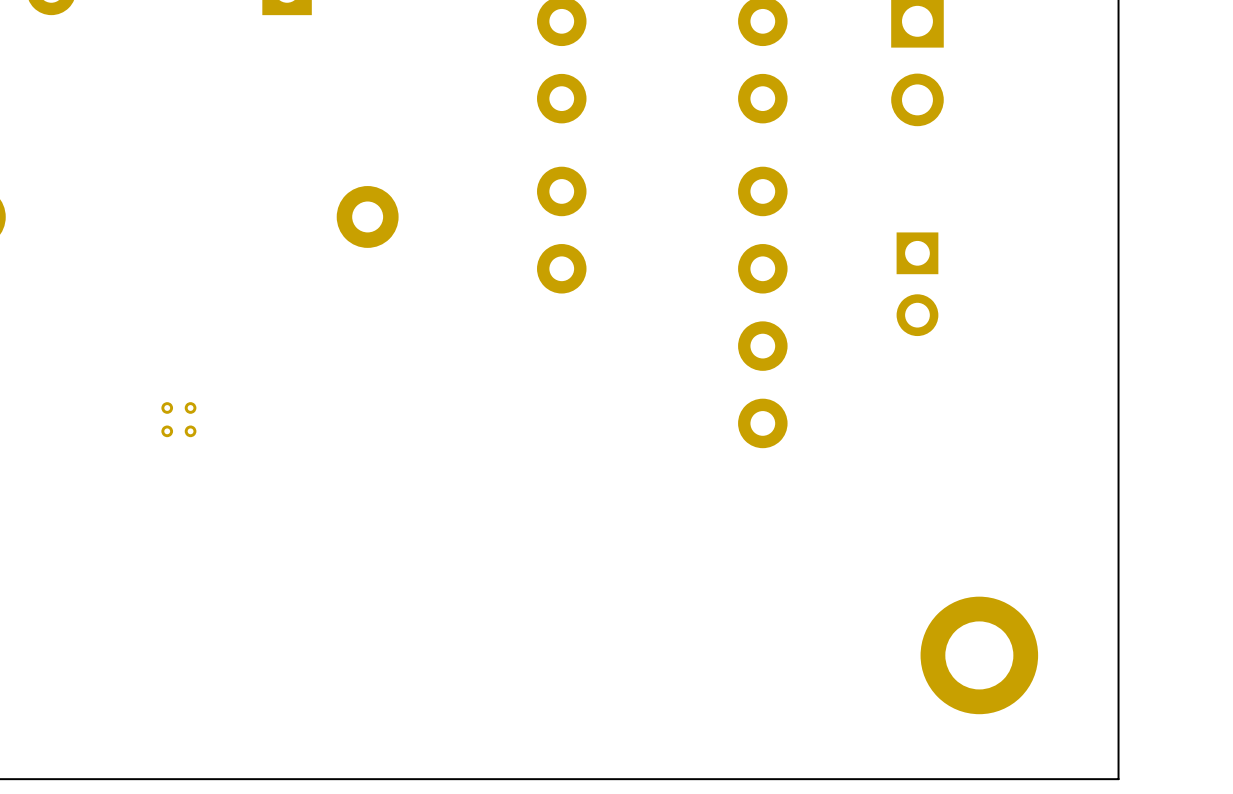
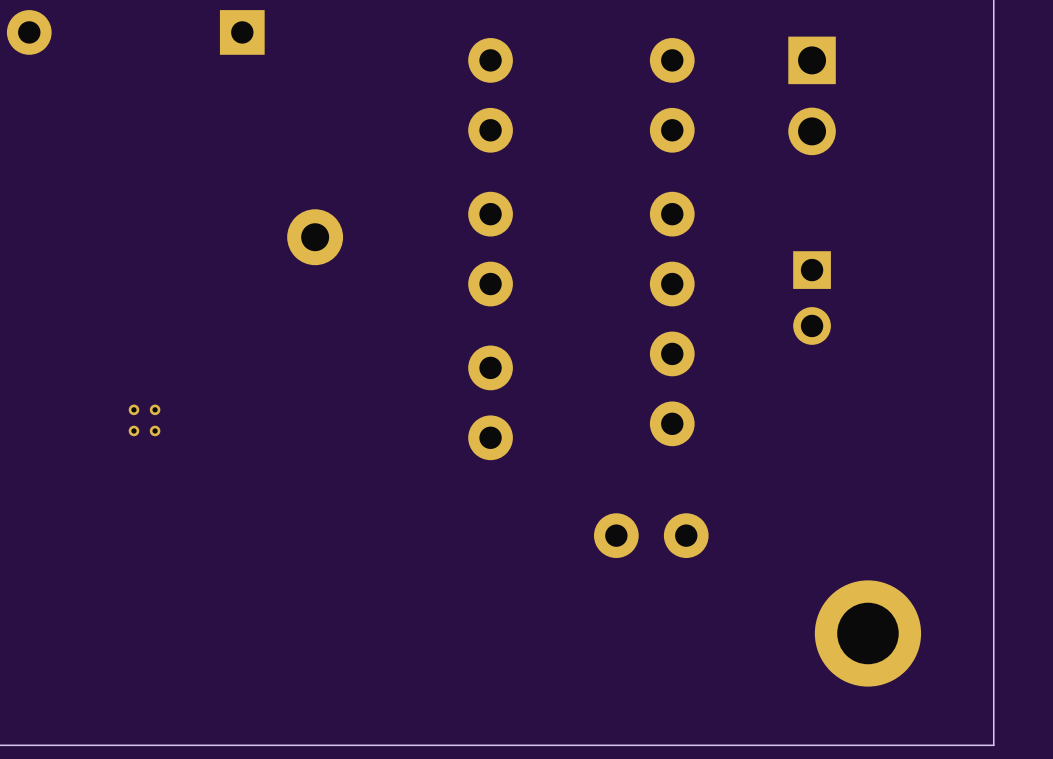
part: none -> (490, 402)
part: none -> (651, 535)

